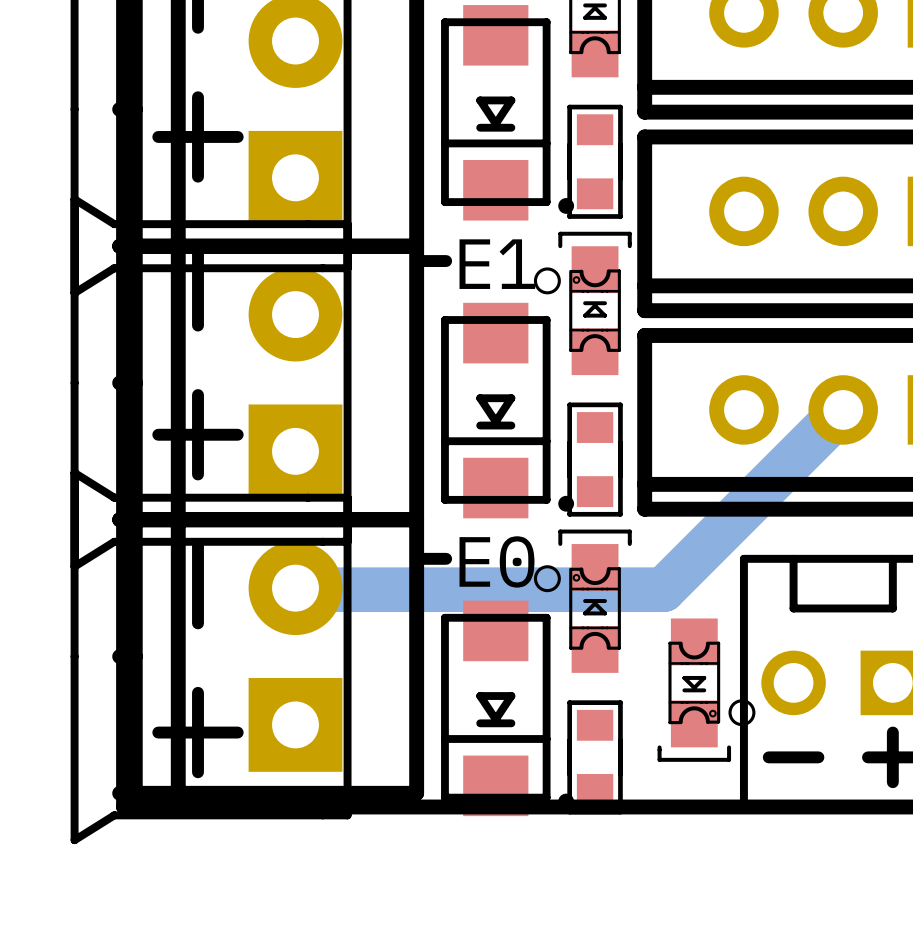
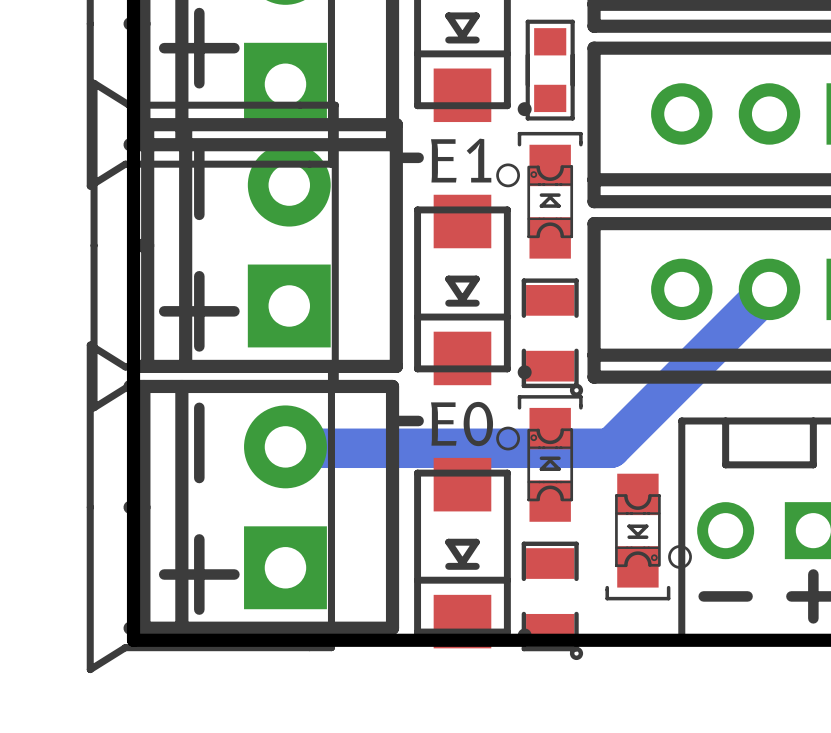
part position: (247, 382) -> (246, 245)
part footprint: [567, 402, 623, 517] -> [521, 278, 584, 397]
part footprint: [567, 700, 623, 815] -> [521, 541, 584, 661]

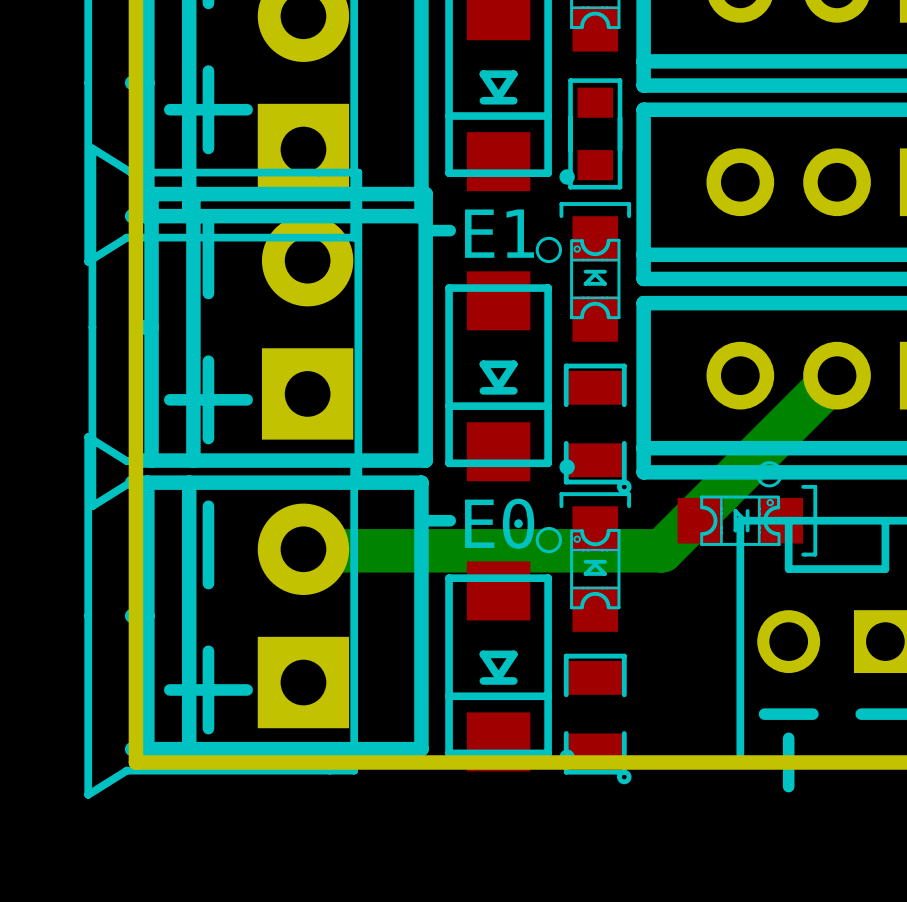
part rotation: 0° (648, 537) -> 90° counterclockwise (747, 508)
part position: (648, 537) -> (747, 508)
line: (813, 574) (813, 618) -> (788, 738) (788, 786)

